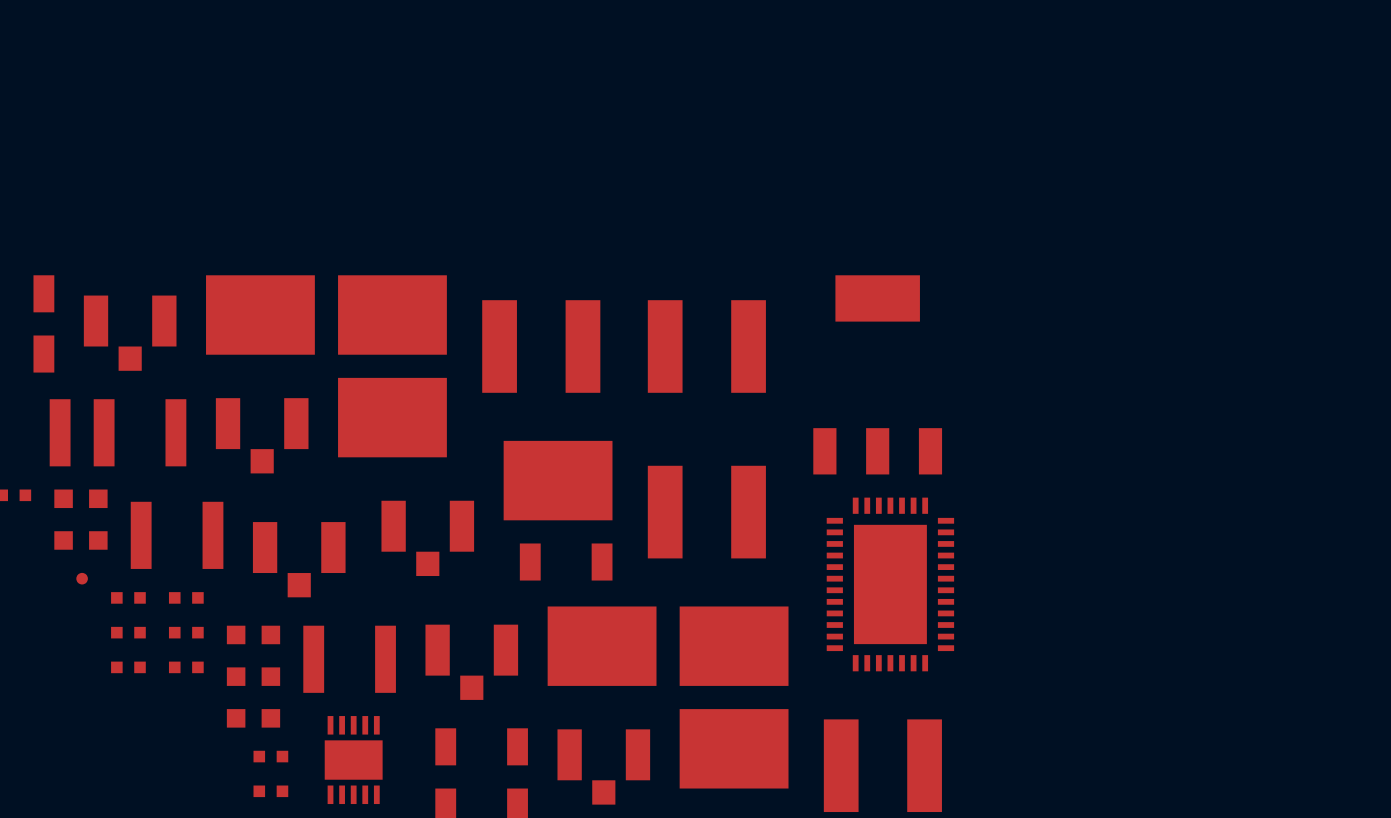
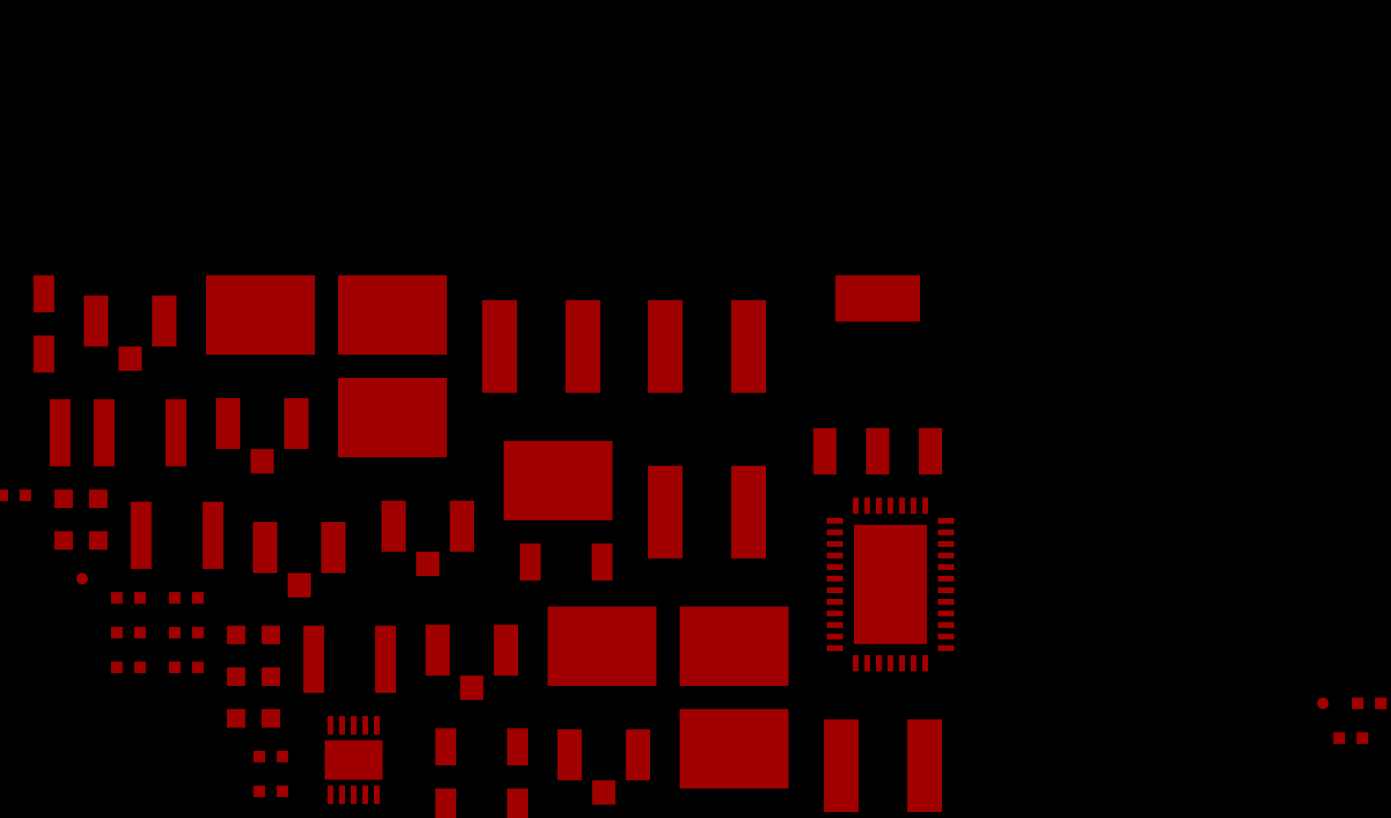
part: none -> (1322, 703)
part: none -> (1369, 703)
part: none -> (1350, 738)

